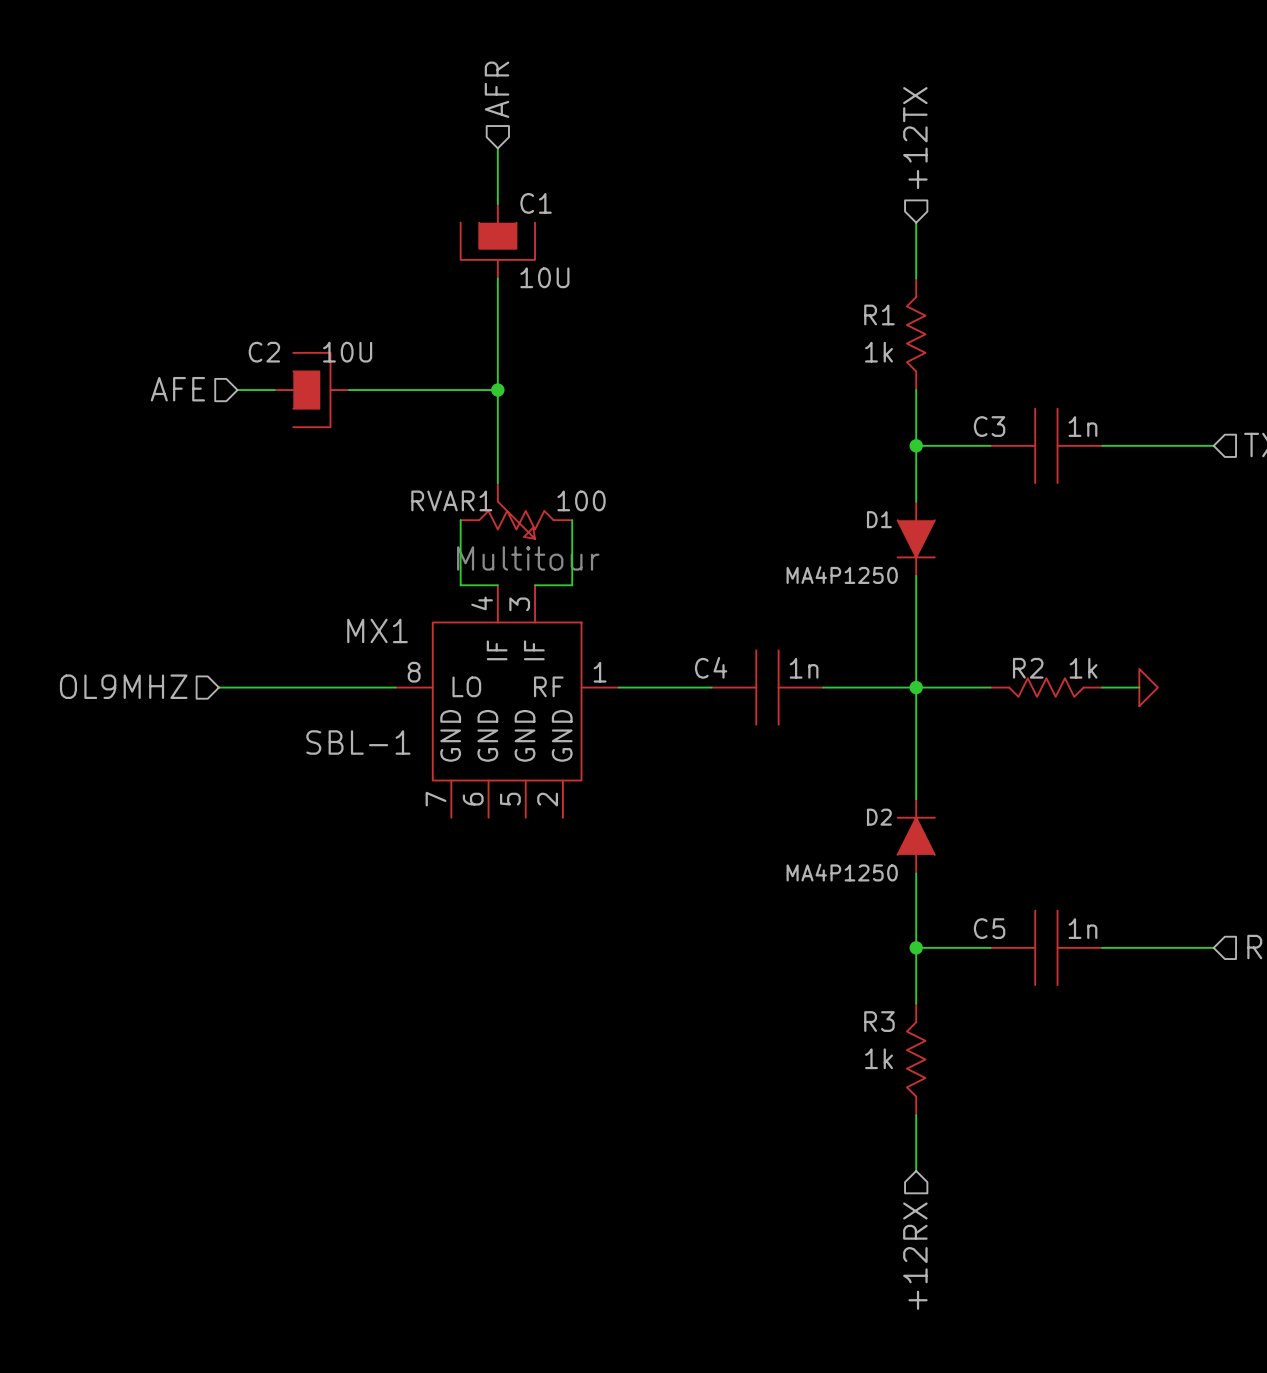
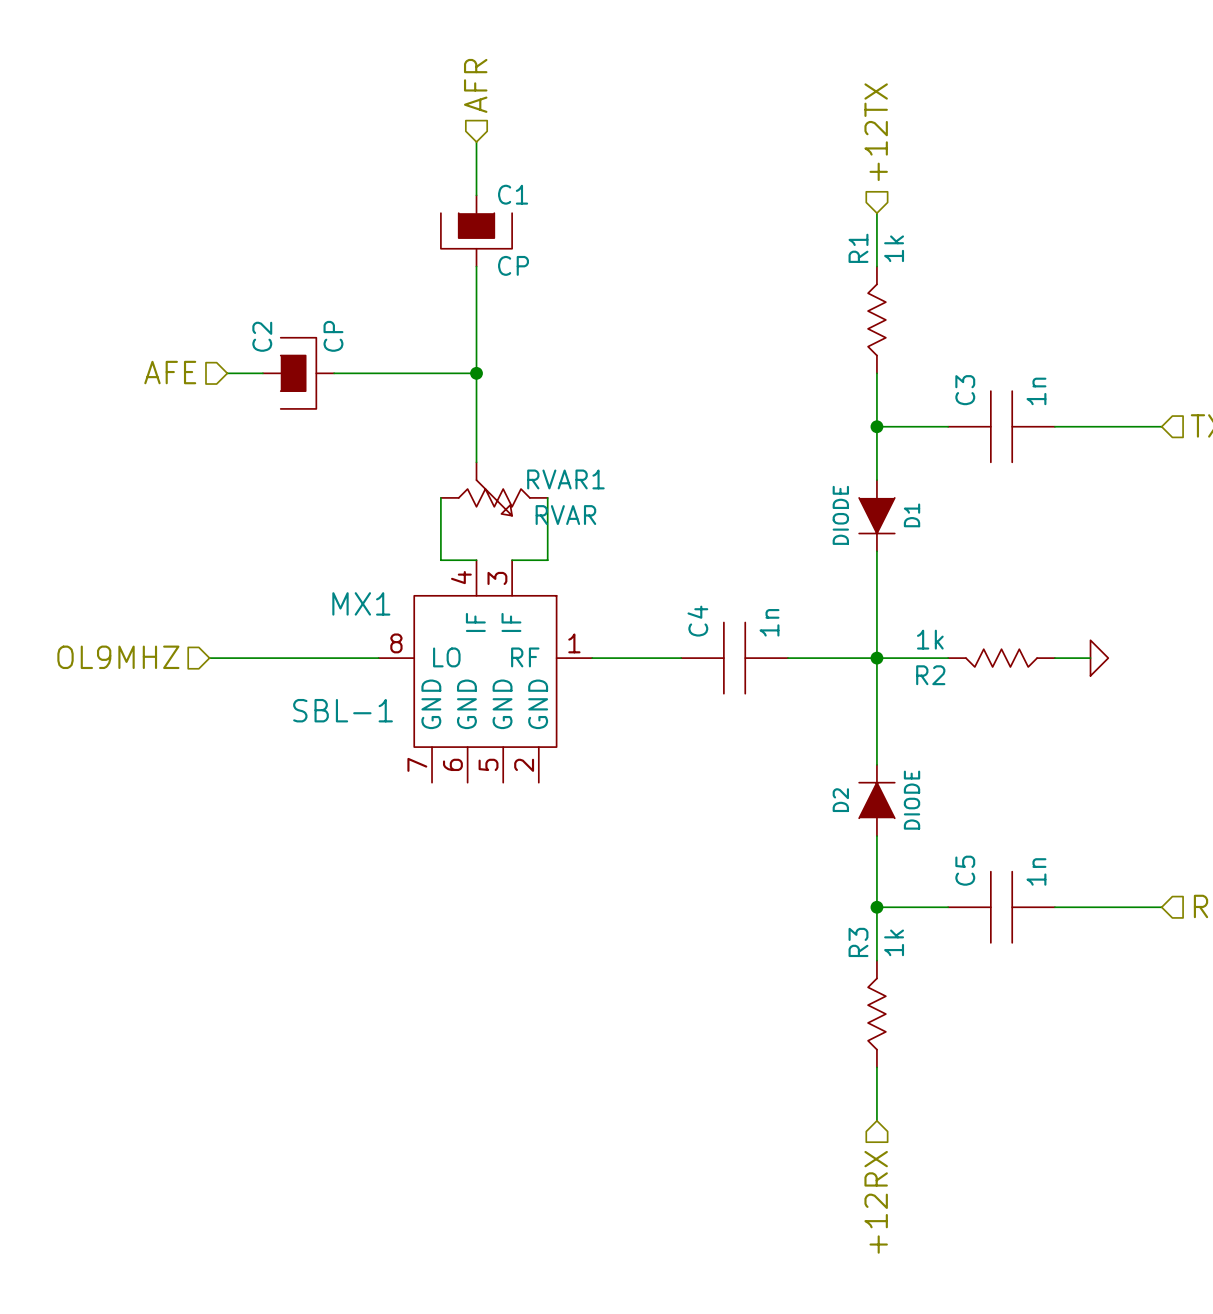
C1 value: 10U (544, 277) -> CP (513, 265)
R1 name rotation: 0° (879, 314) -> 90° counterclockwise (858, 248)
R1 name position: R1 (879, 314) -> R1 (858, 248)
C2 name rotation: 0° (264, 352) -> 90° counterclockwise (262, 336)
C2 value: 10U (347, 352) -> CP (333, 336)
R1 value rotation: 0° (879, 352) -> 90° counterclockwise (894, 248)
R1 value position: 1k (879, 352) -> 1k (894, 248)
C3 name rotation: 0° (989, 426) -> 90° counterclockwise (965, 390)
C3 value rotation: 0° (1082, 426) -> 90° counterclockwise (1036, 391)
RVAR1 name position: RVAR1 (451, 500) -> RVAR1 (565, 479)
RVAR1 value: 100 (581, 500) -> RVAR (565, 515)
D1 name rotation: 0° (879, 519) -> 90° counterclockwise (912, 515)
D1 name position: D1 (879, 519) -> D1 (912, 515)
text: Multitour (528, 558) -> none
D1 value: MA4P1250 (842, 575) -> DIODE (840, 515)
C4 name rotation: 0° (711, 667) -> 90° counterclockwise (697, 621)
C4 value rotation: 0° (804, 668) -> 90° counterclockwise (769, 622)
R2 name position: R2 (1028, 668) -> R2 (930, 675)
R2 value position: 1k (1083, 668) -> 1k (930, 639)
D2 name rotation: 0° (879, 817) -> 90° counterclockwise (840, 800)
D2 value: MA4P1250 (842, 872) -> DIODE (912, 800)
C5 name rotation: 0° (989, 928) -> 90° counterclockwise (965, 870)
C5 value rotation: 0° (1082, 928) -> 90° counterclockwise (1036, 871)
R3 name rotation: 0° (879, 1021) -> 90° counterclockwise (858, 942)
R3 value rotation: 0° (879, 1058) -> 90° counterclockwise (894, 942)
R3 value position: 1k (879, 1058) -> 1k (894, 942)

